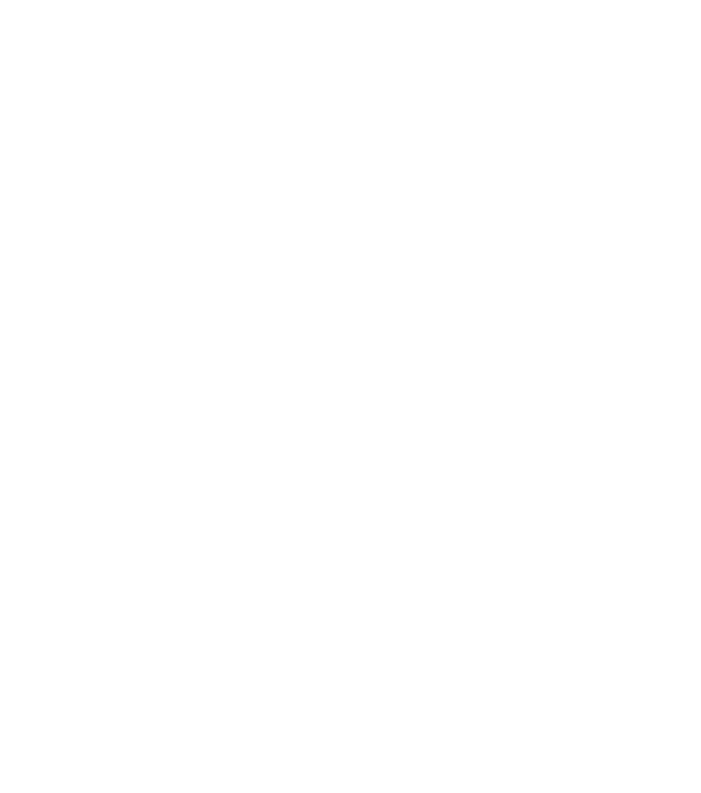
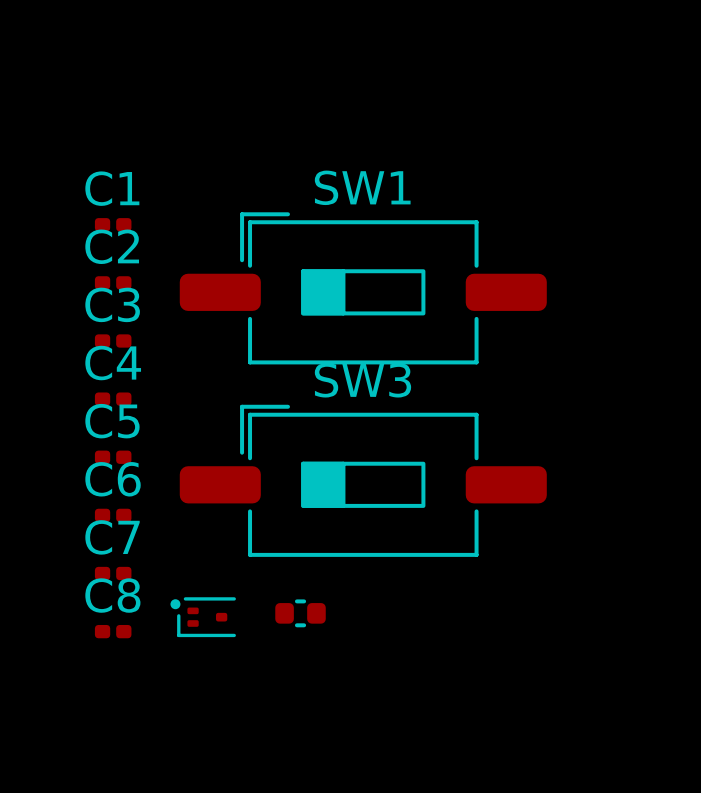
C1: none -> (113, 224)
C2: none -> (113, 282)
SW1: none -> (363, 288)
C3: none -> (113, 340)
C4: none -> (113, 399)
C5: none -> (113, 457)
SW3: none -> (363, 480)
C6: none -> (113, 515)
C7: none -> (113, 573)
part: none -> (300, 613)
part: none -> (203, 617)
C8: none -> (113, 631)

